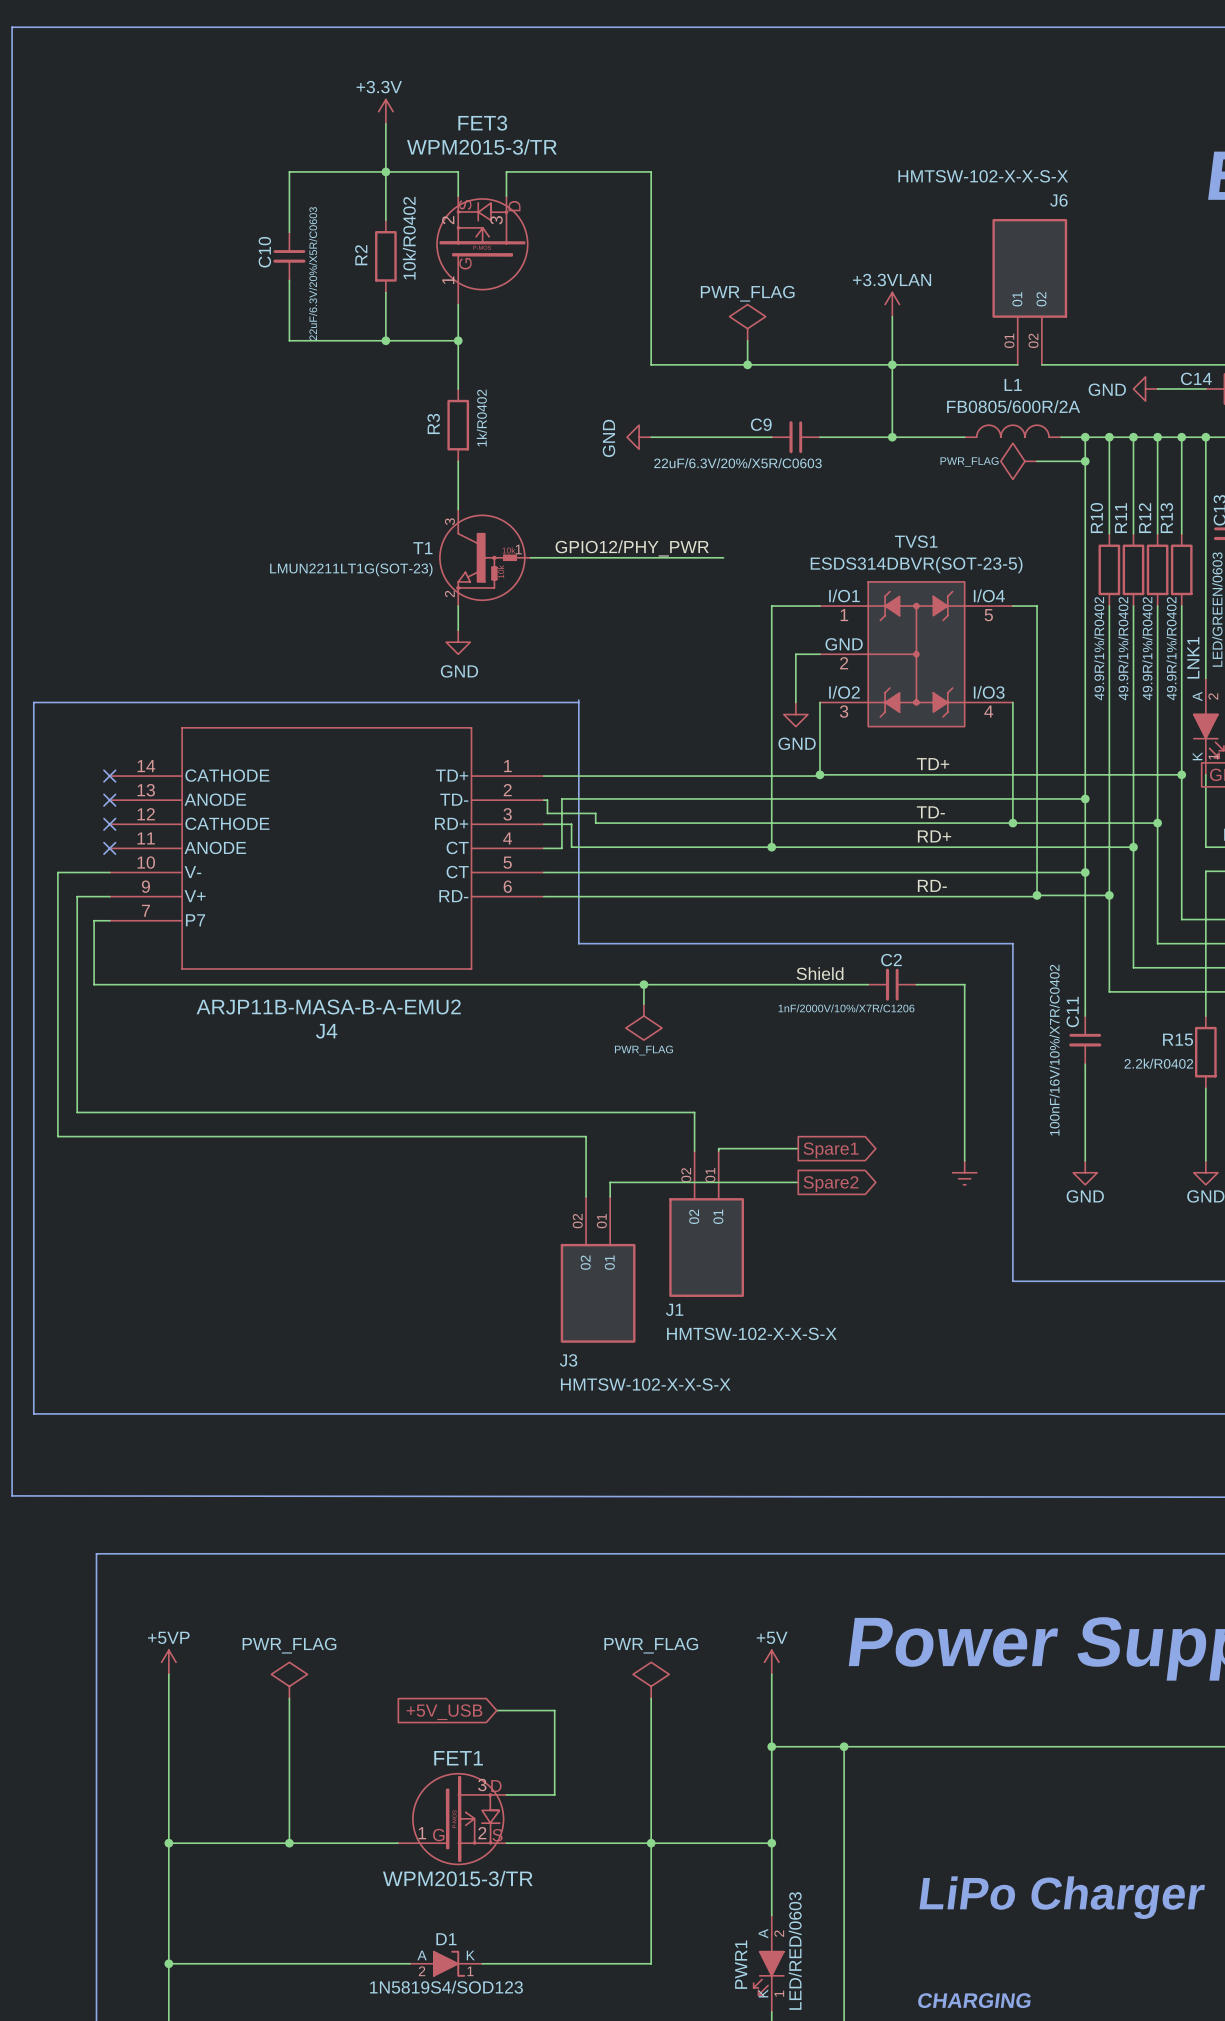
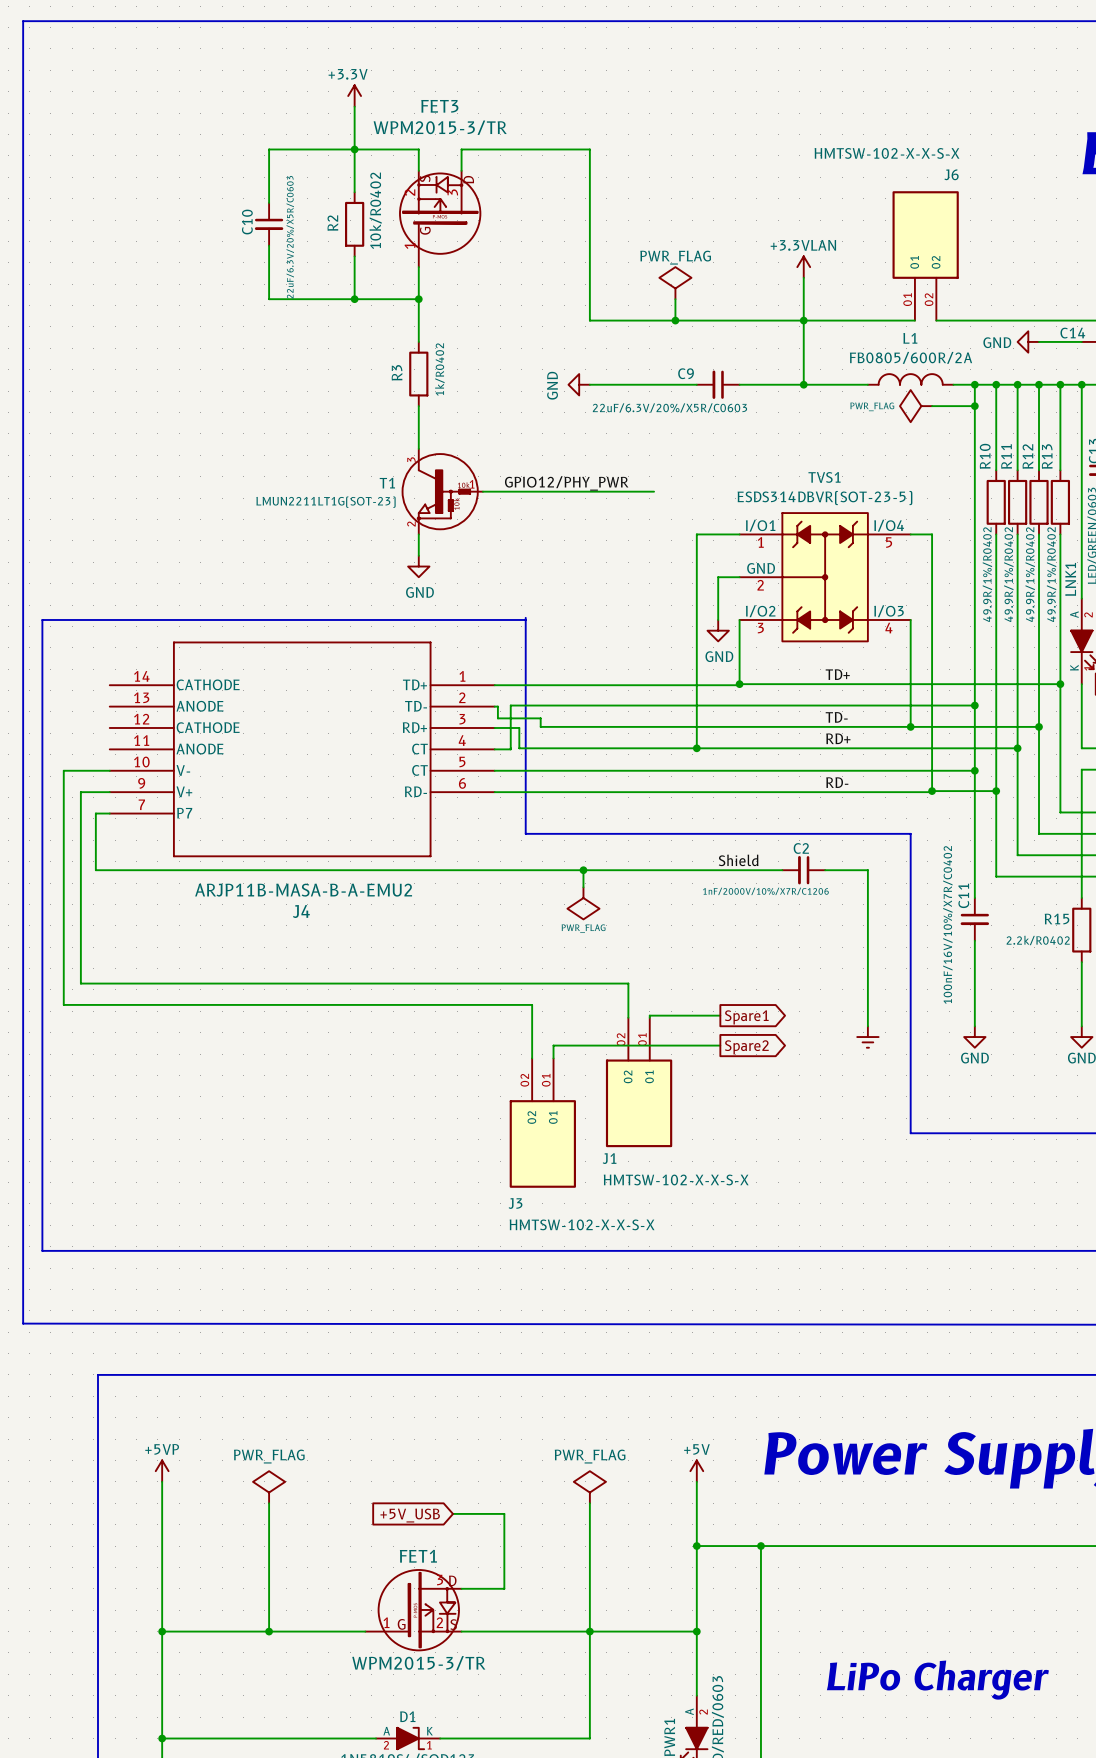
no-connect mark: (109, 776) -> none
no-connect mark: (109, 800) -> none
no-connect mark: (109, 824) -> none
no-connect mark: (109, 848) -> none

